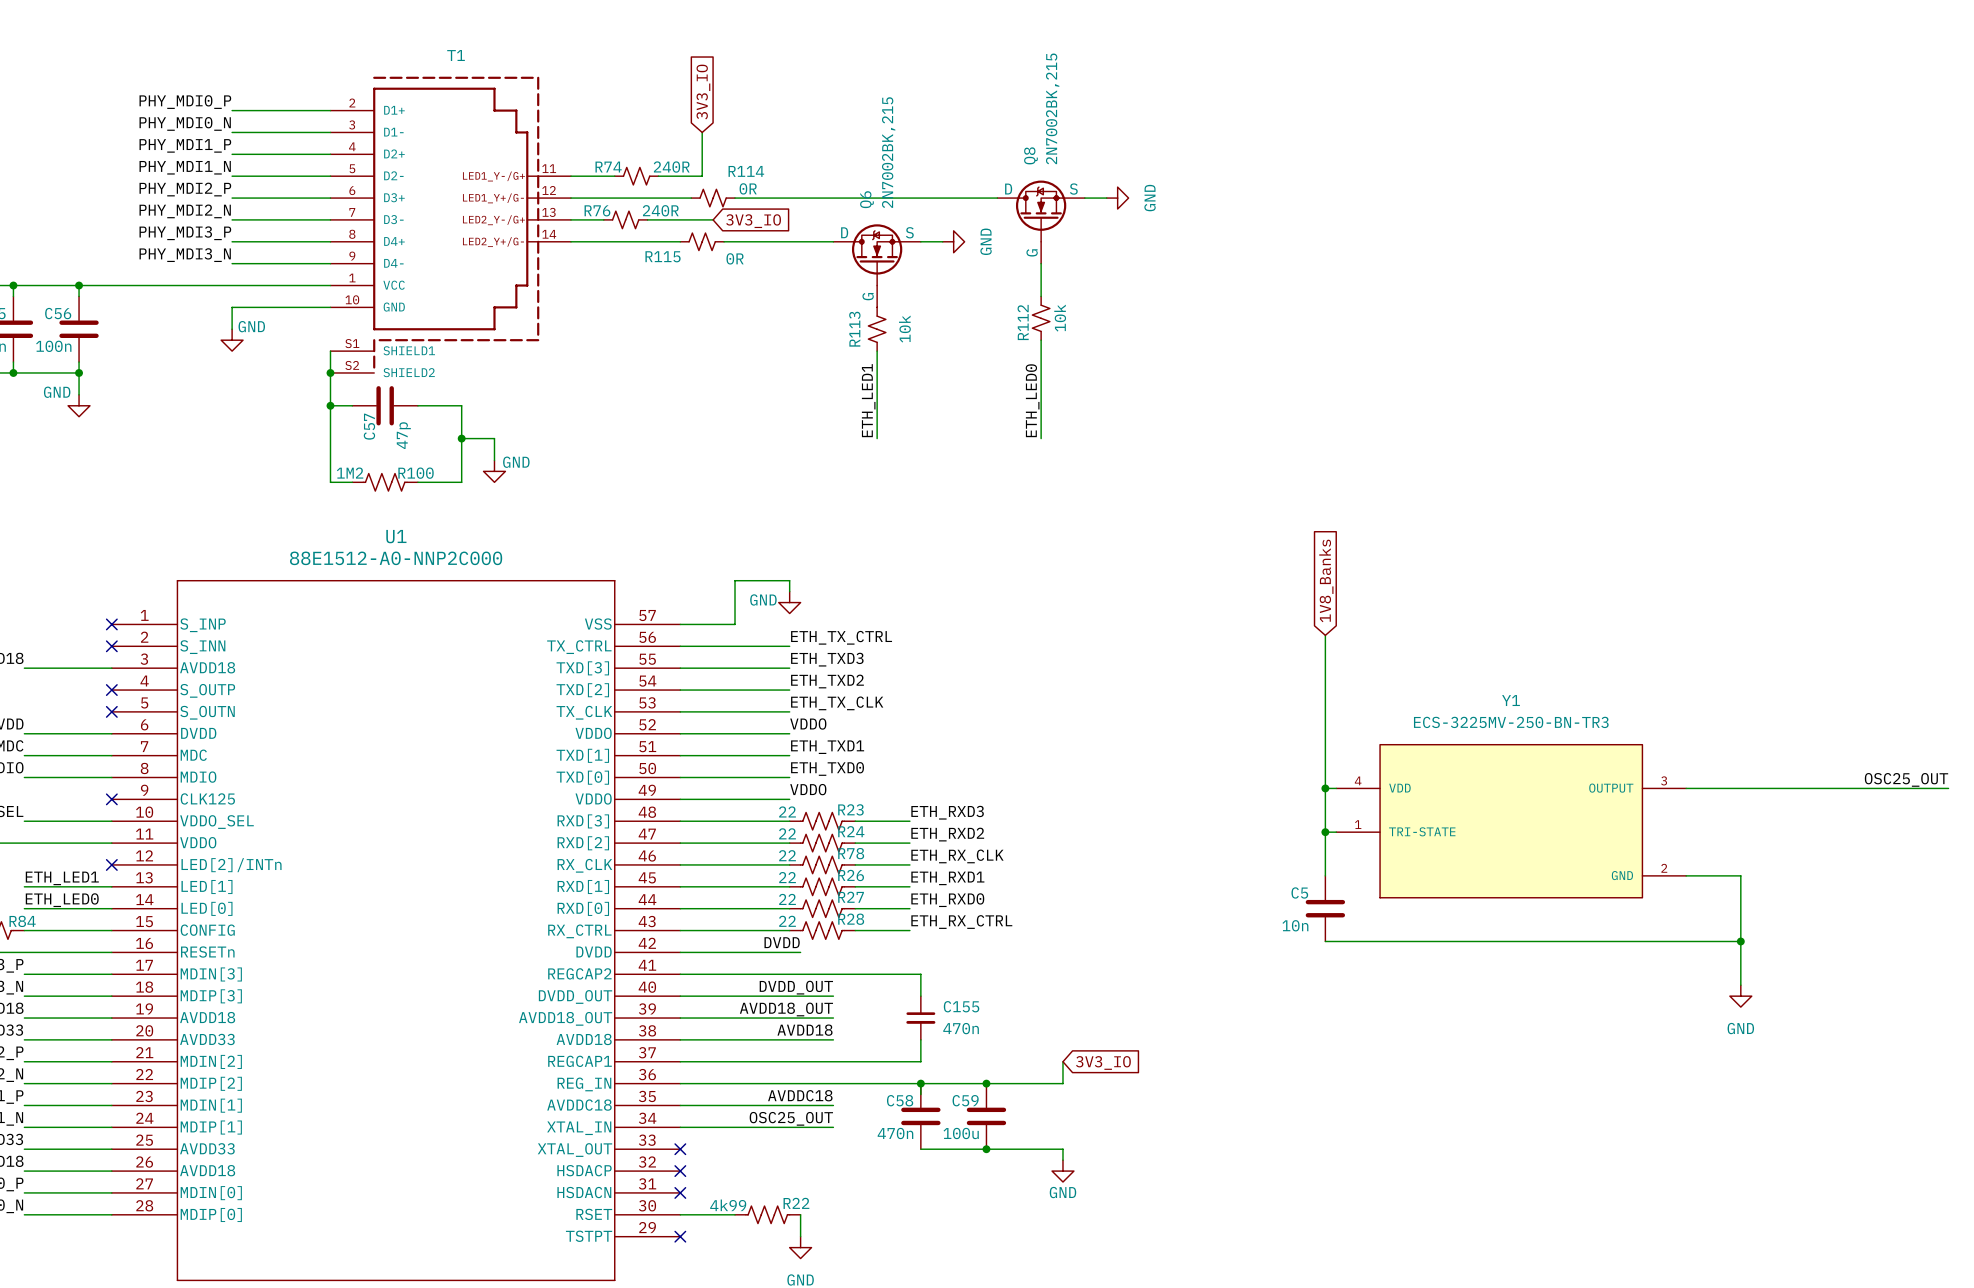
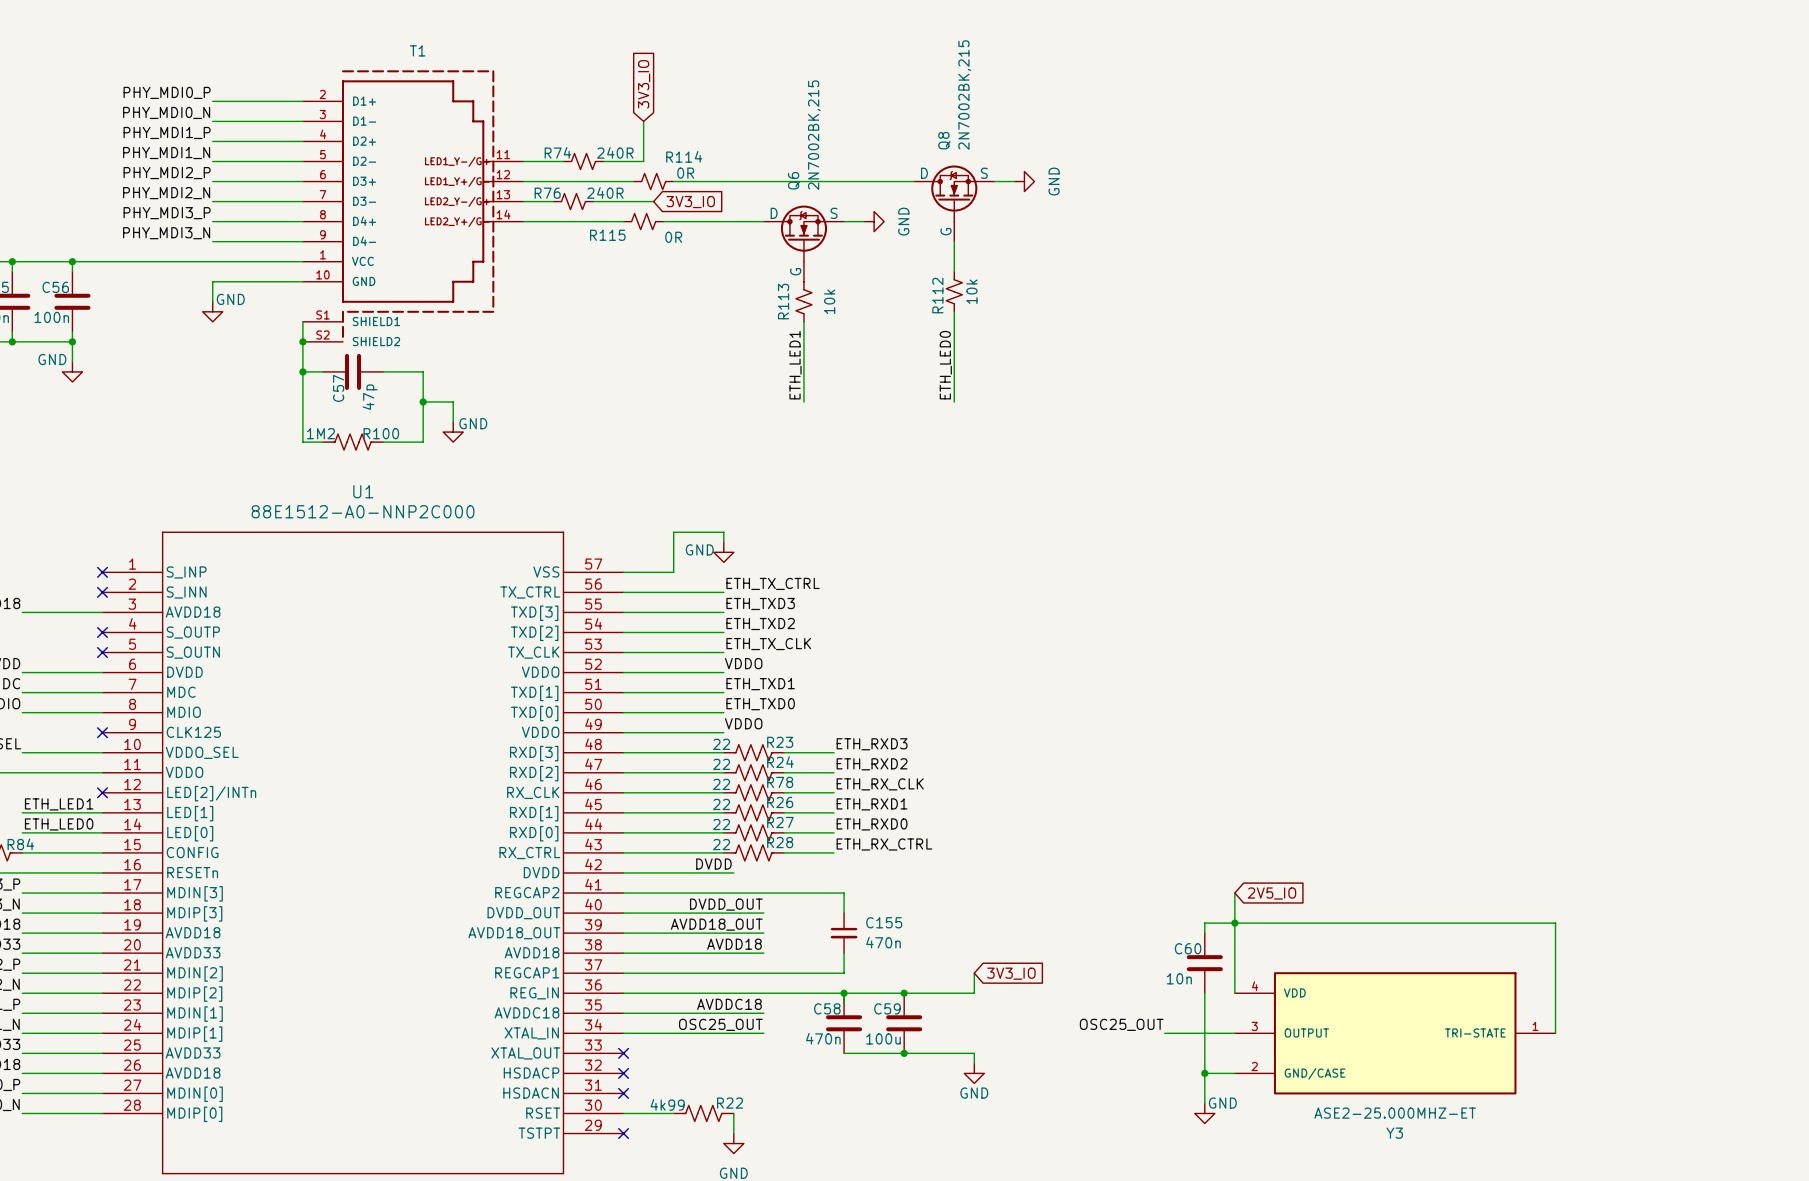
global label: 1V8_Banks (1326, 580) -> none
wire: (1325, 635) (1325, 875) -> none
label: OSC25_OUT (1906, 779) -> none
wire: (1325, 788) (1336, 788) -> none
junction: (1325, 788) -> none
wire: (1686, 788) (1948, 788) -> none
Y1: ECS-3225MV-250-BN-TR3 (1511, 821) -> none
wire: (1325, 832) (1336, 832) -> none
junction: (1325, 832) -> none
wire: (1686, 875) (1740, 875) (1740, 985) -> none
C5: 10n (1325, 908) -> none
wire: (1325, 941) (1740, 941) -> none
junction: (1740, 941) -> none
wire: none -> (1234, 893) (1234, 993)
global label: none -> 2V5_IO (1271, 893)
power symbol: GND (1740, 996) -> none
junction: none -> (1234, 923)
wire: none -> (1204, 933) (1204, 923) (1555, 923) (1555, 1033)
C60: none -> 10n (1204, 963)
wire: none -> (1204, 993) (1204, 1103)
label: none -> OSC25_OUT (1121, 1024)
wire: none -> (1164, 1033) (1234, 1033)
Y3: none -> ASE2-25.000MHZ-ET (1395, 1033)
wire: none -> (1204, 1073) (1234, 1073)
junction: none -> (1204, 1073)
power symbol: none -> GND (1204, 1113)

